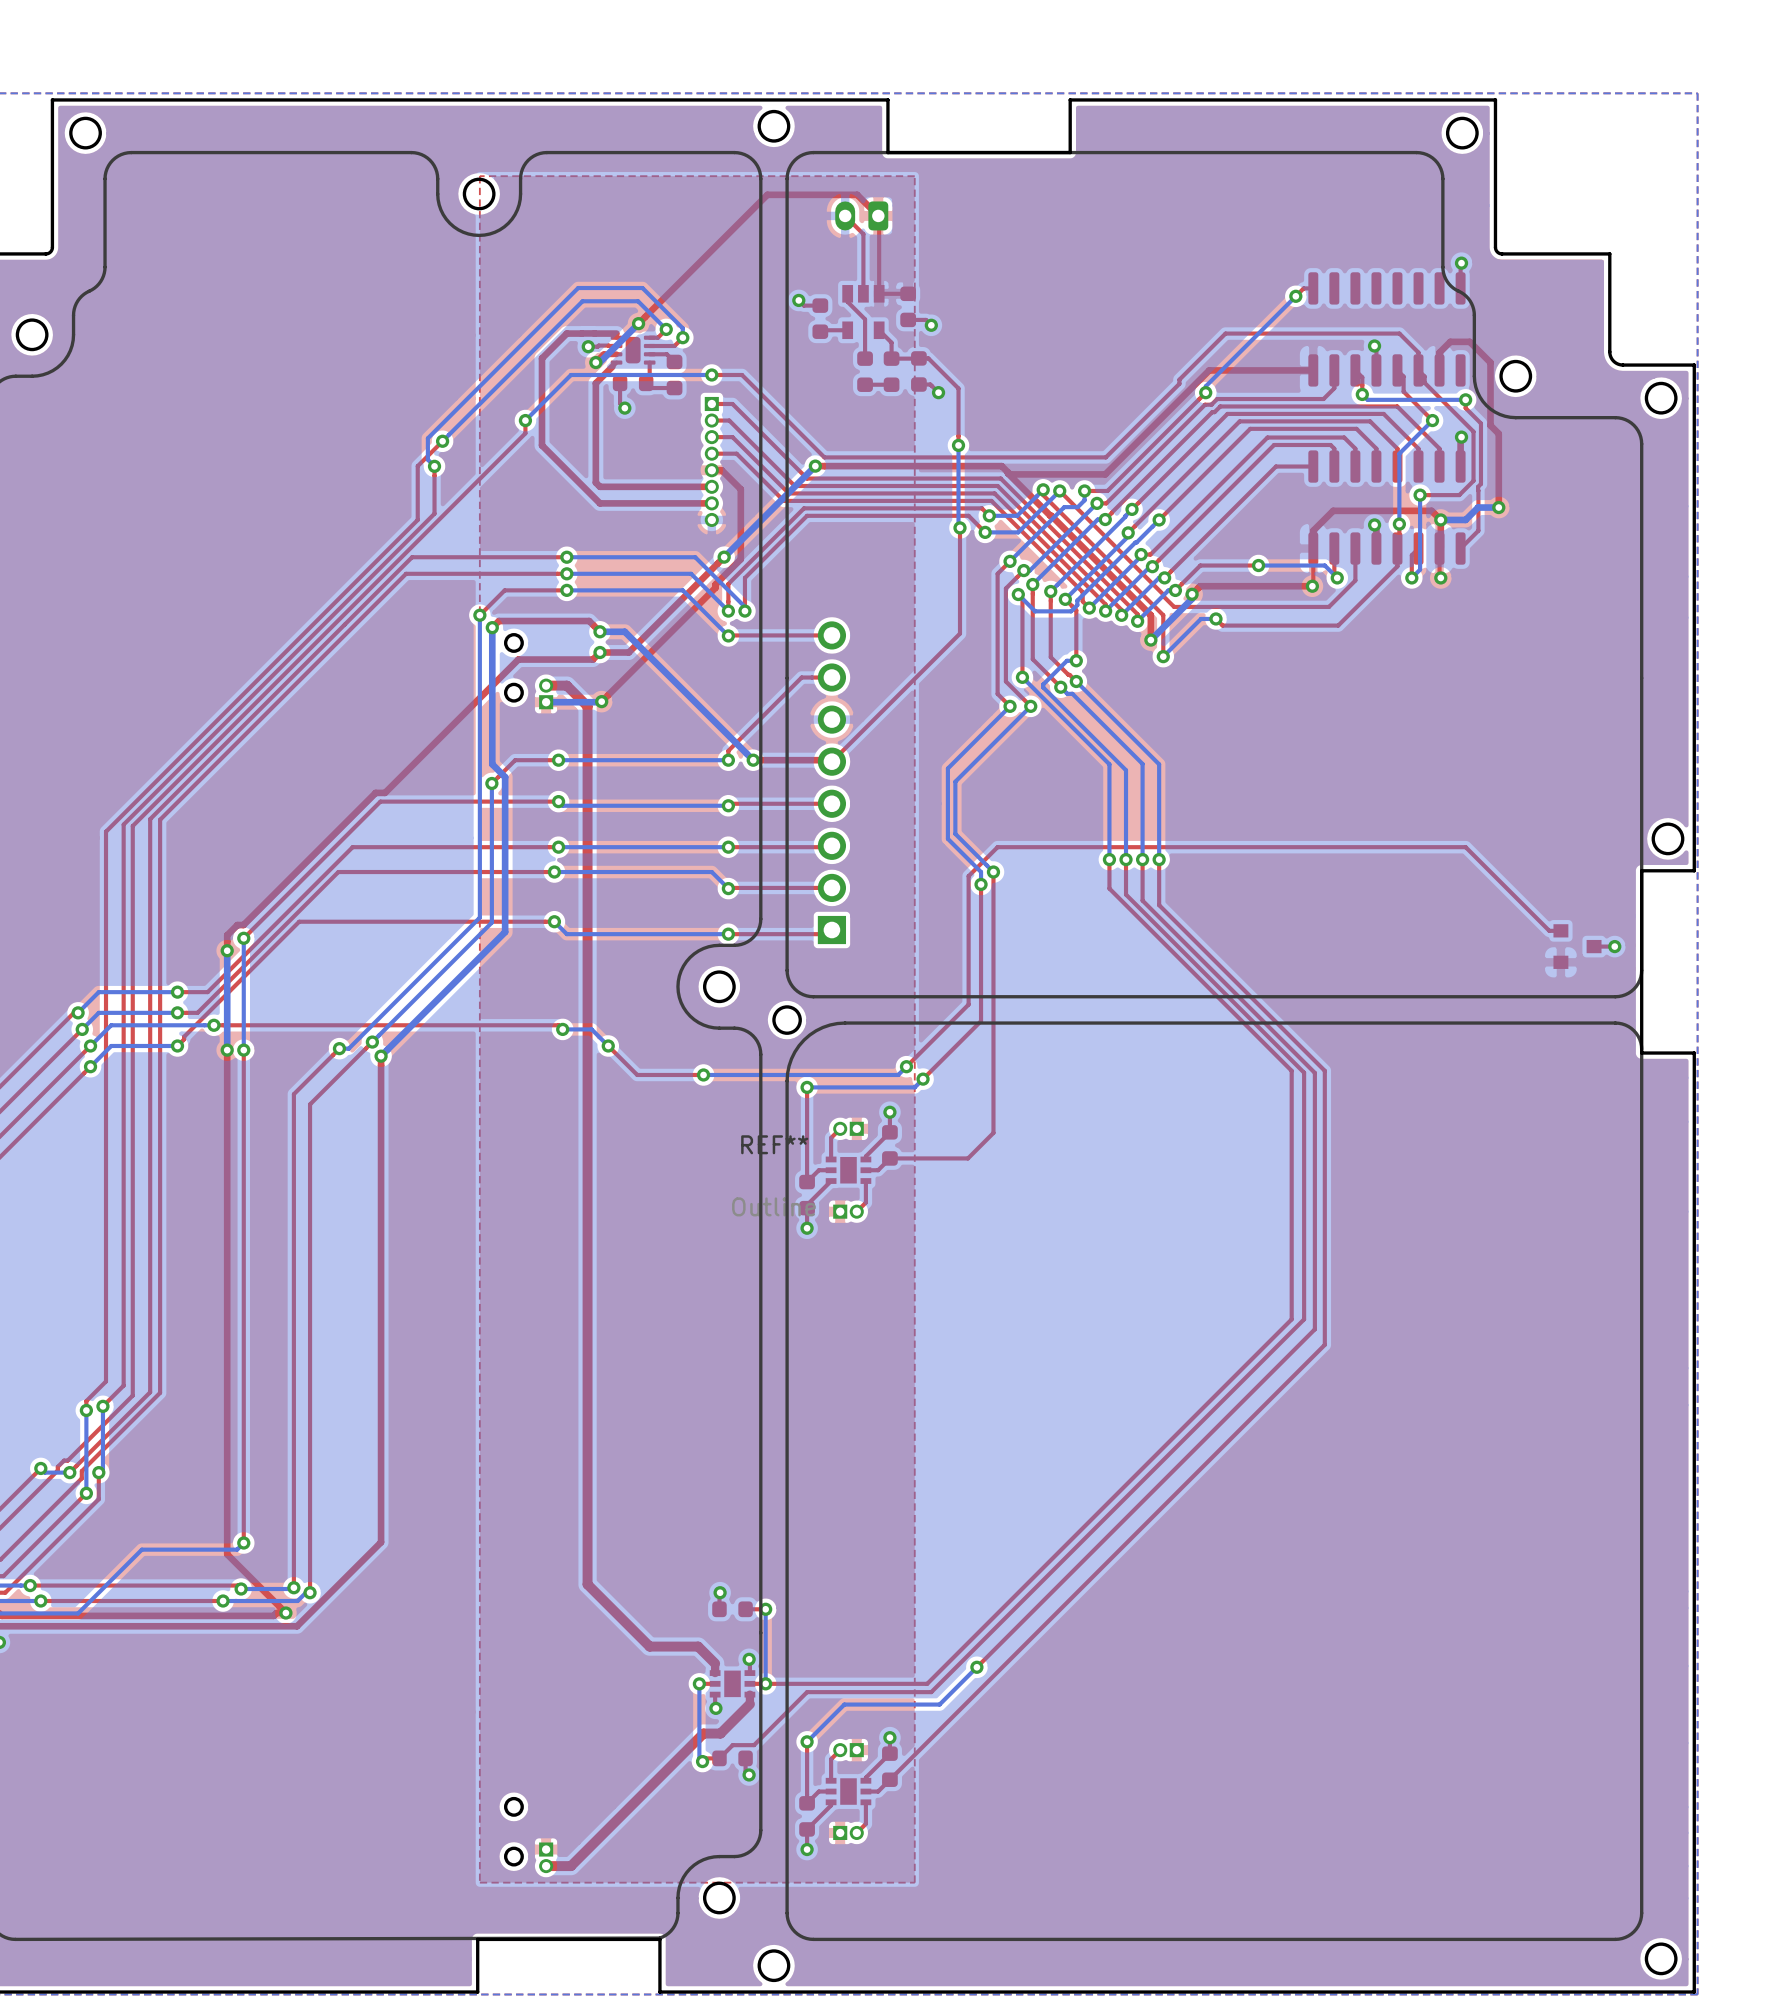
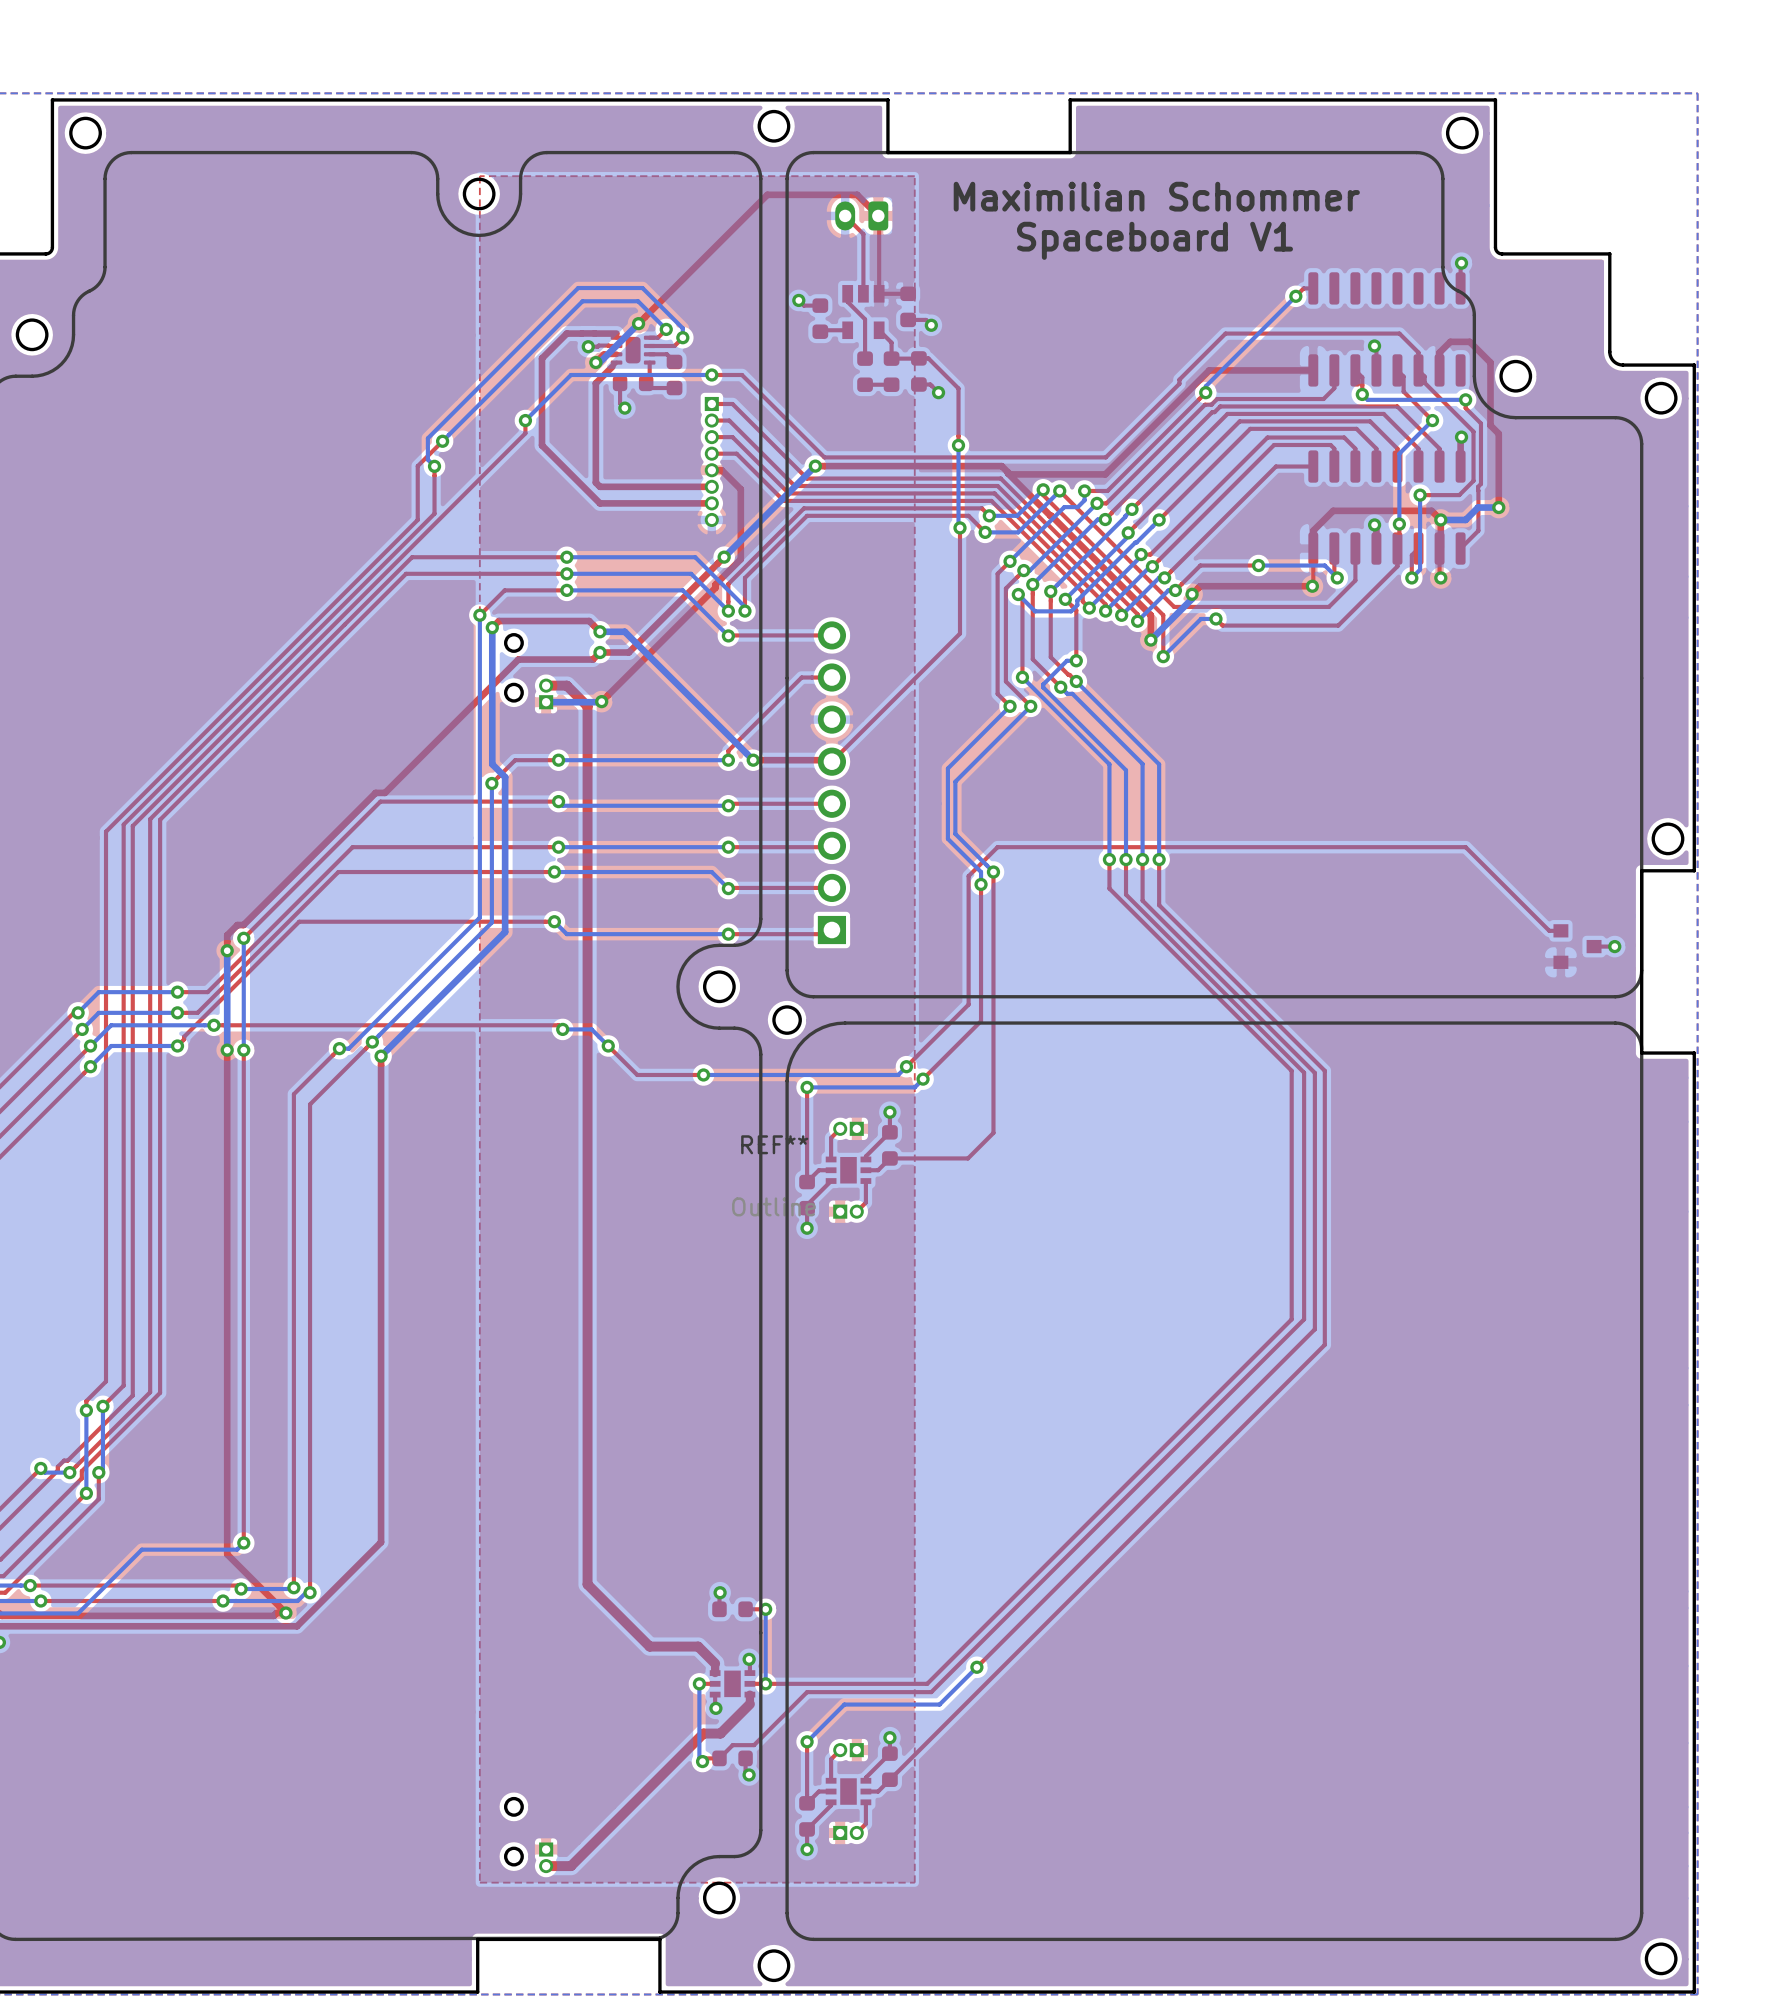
text: none -> Maximilian Schommer (1156, 196)
text: none -> Spaceboard V1 (1155, 240)

